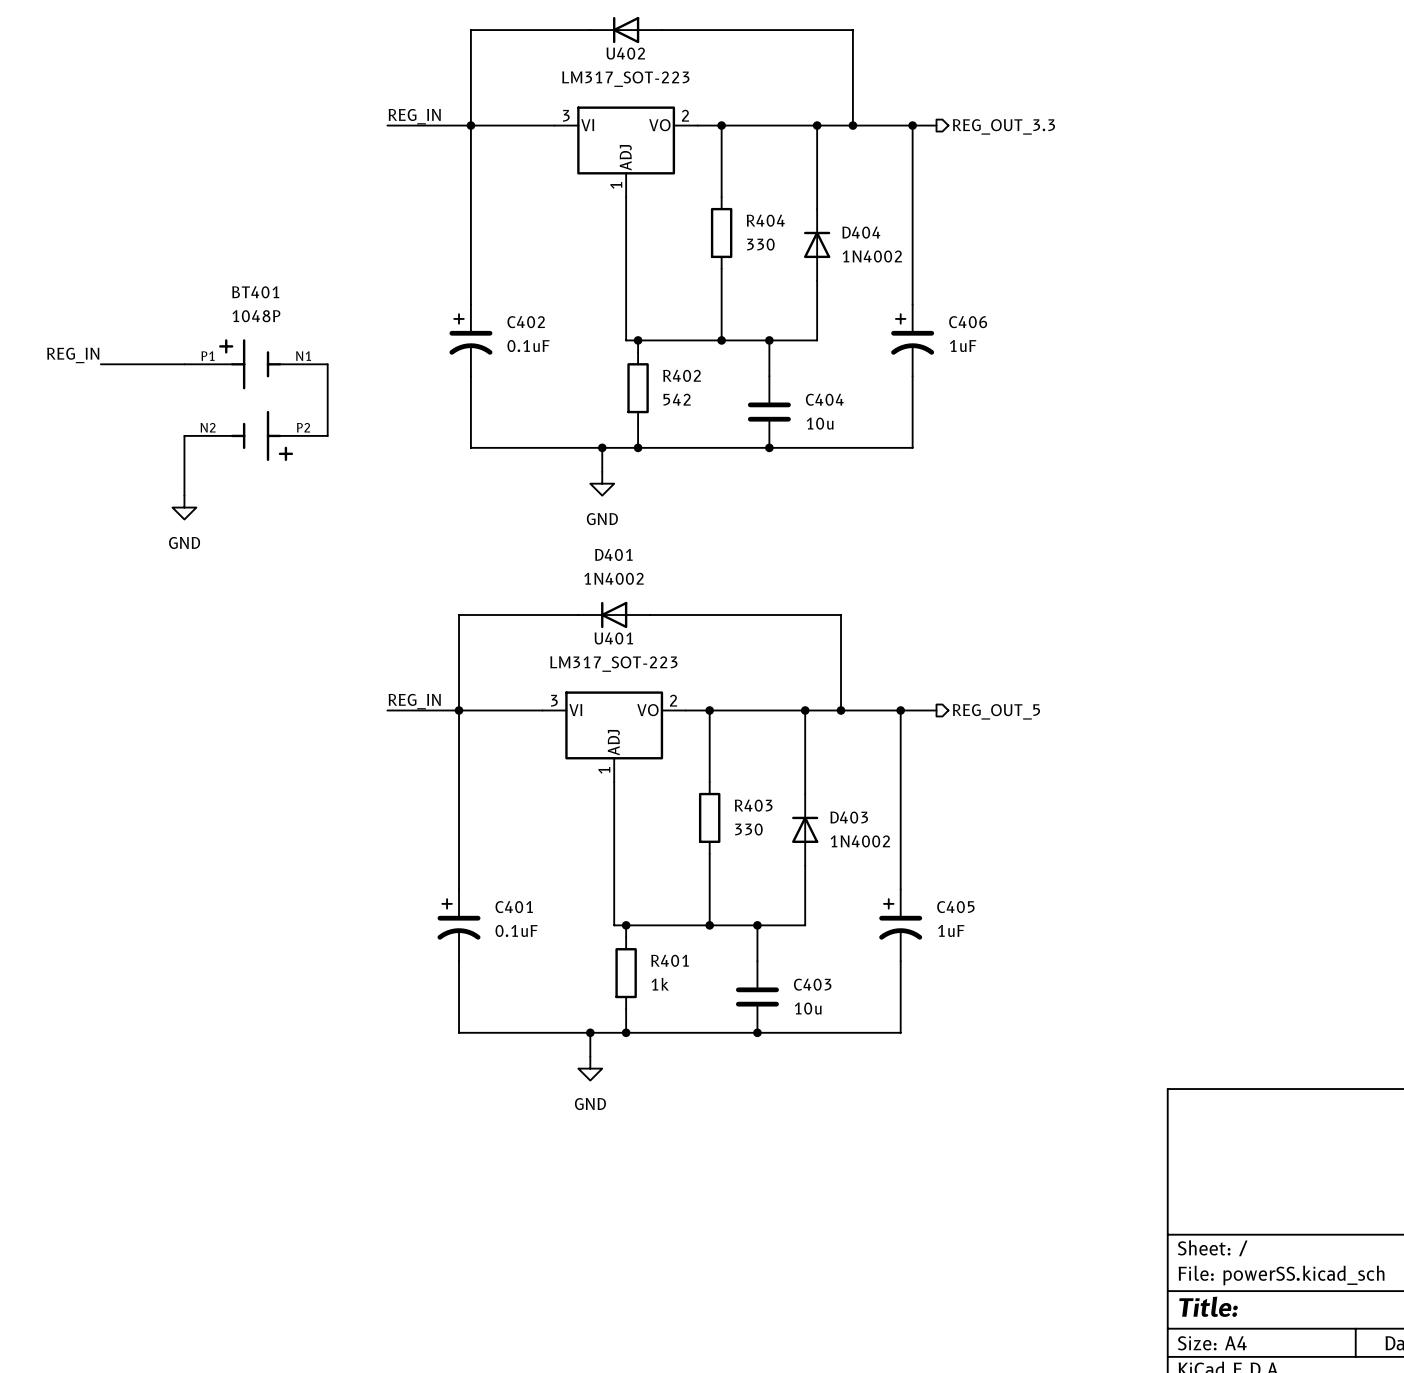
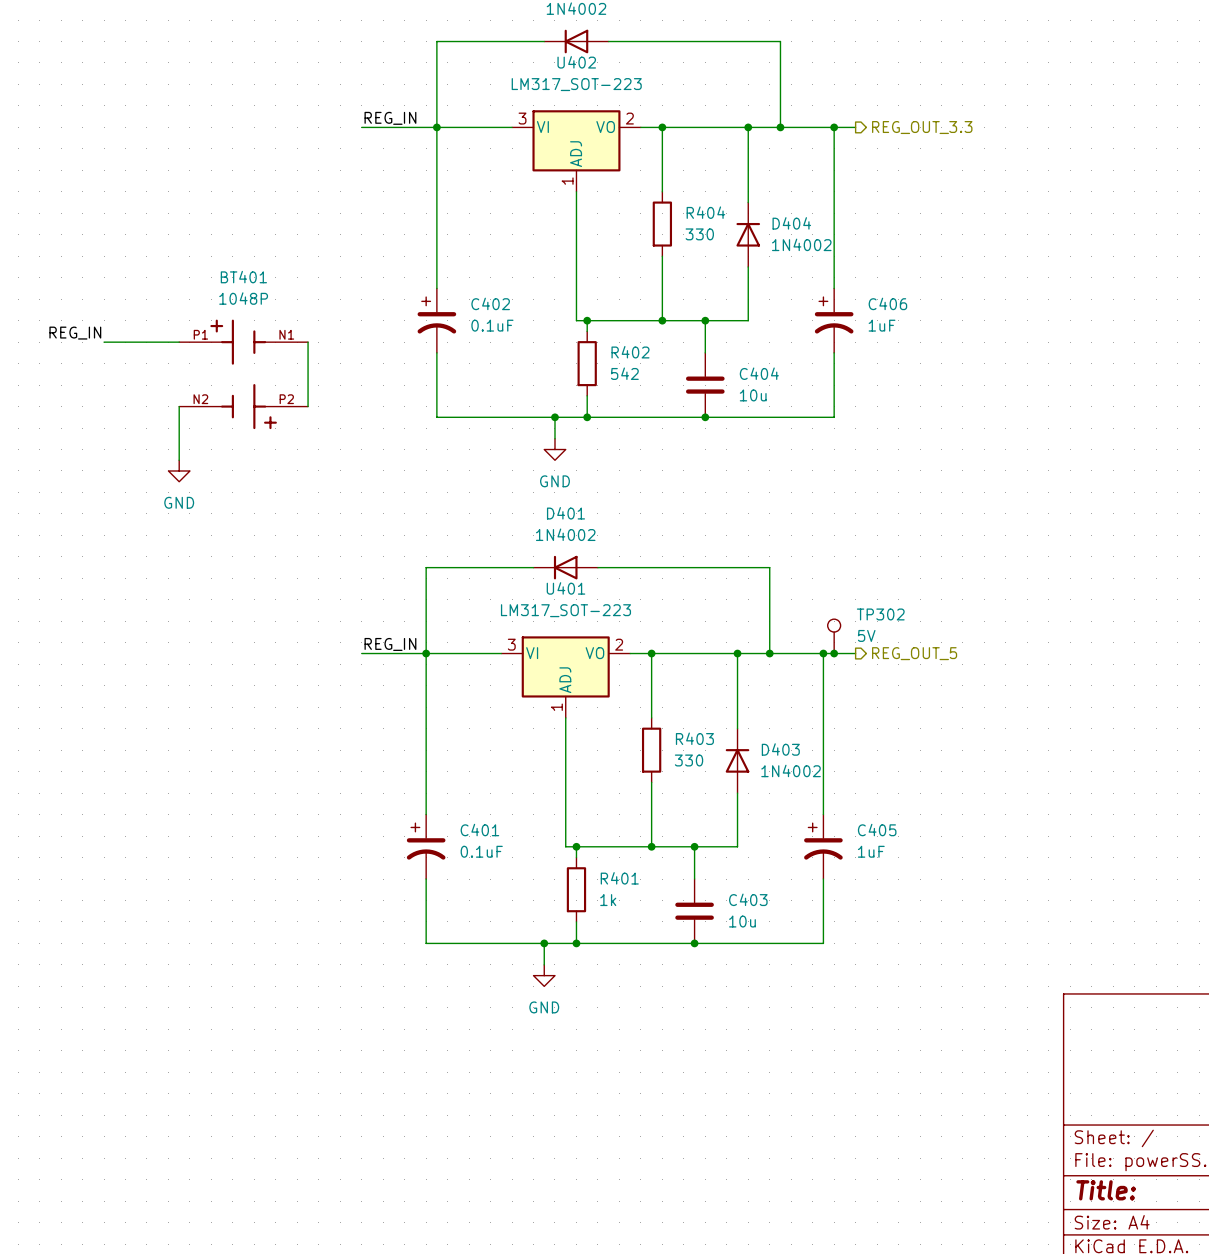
TP302: none -> 5V (834, 636)
junction: none -> (834, 653)

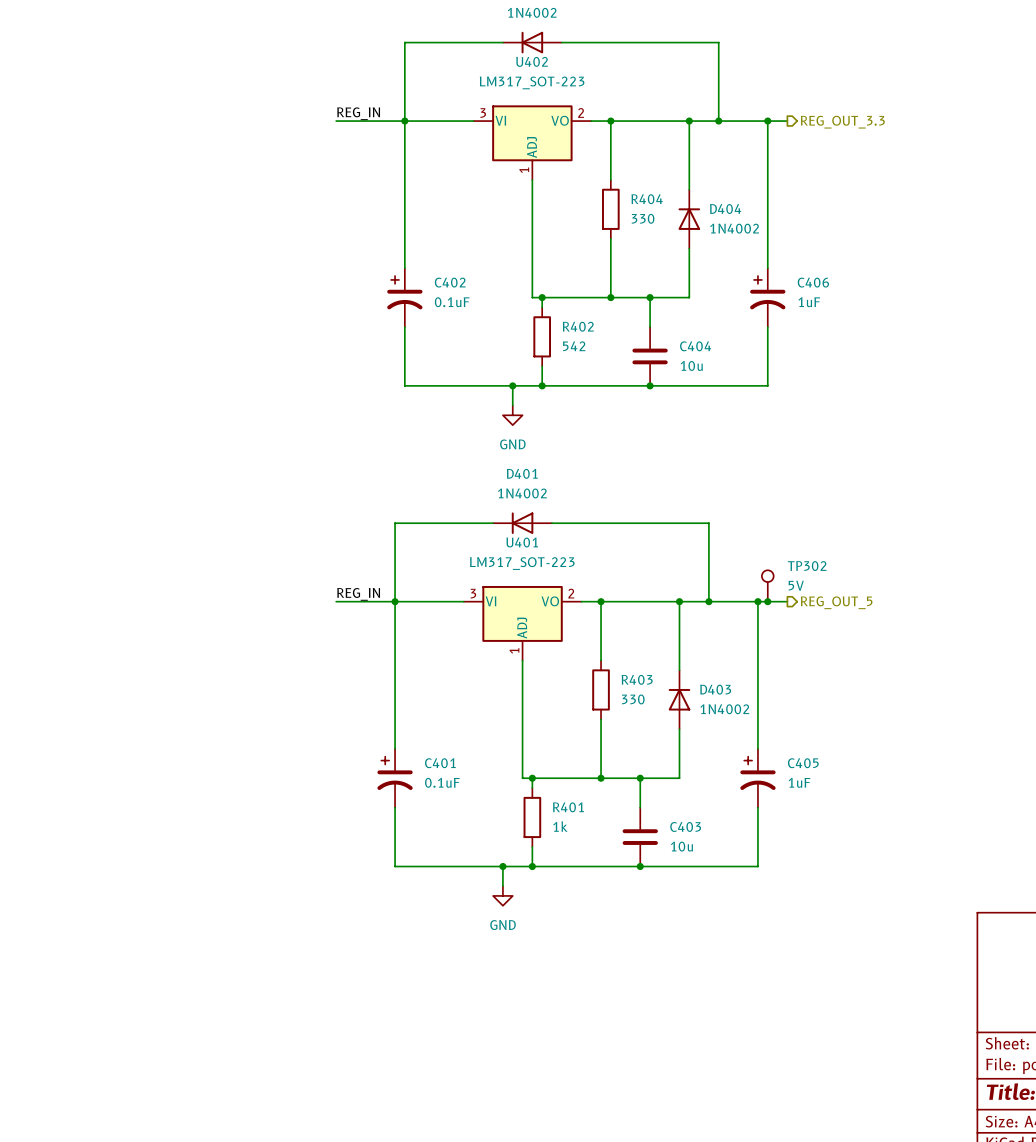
label: REG_IN (75, 333) -> none
wire: (104, 342) (179, 342) -> none
wire: (308, 342) (308, 406) -> none
BT401: 1048P (243, 374) -> none
wire: (179, 406) (179, 460) -> none
power symbol: GND (179, 470) -> none

